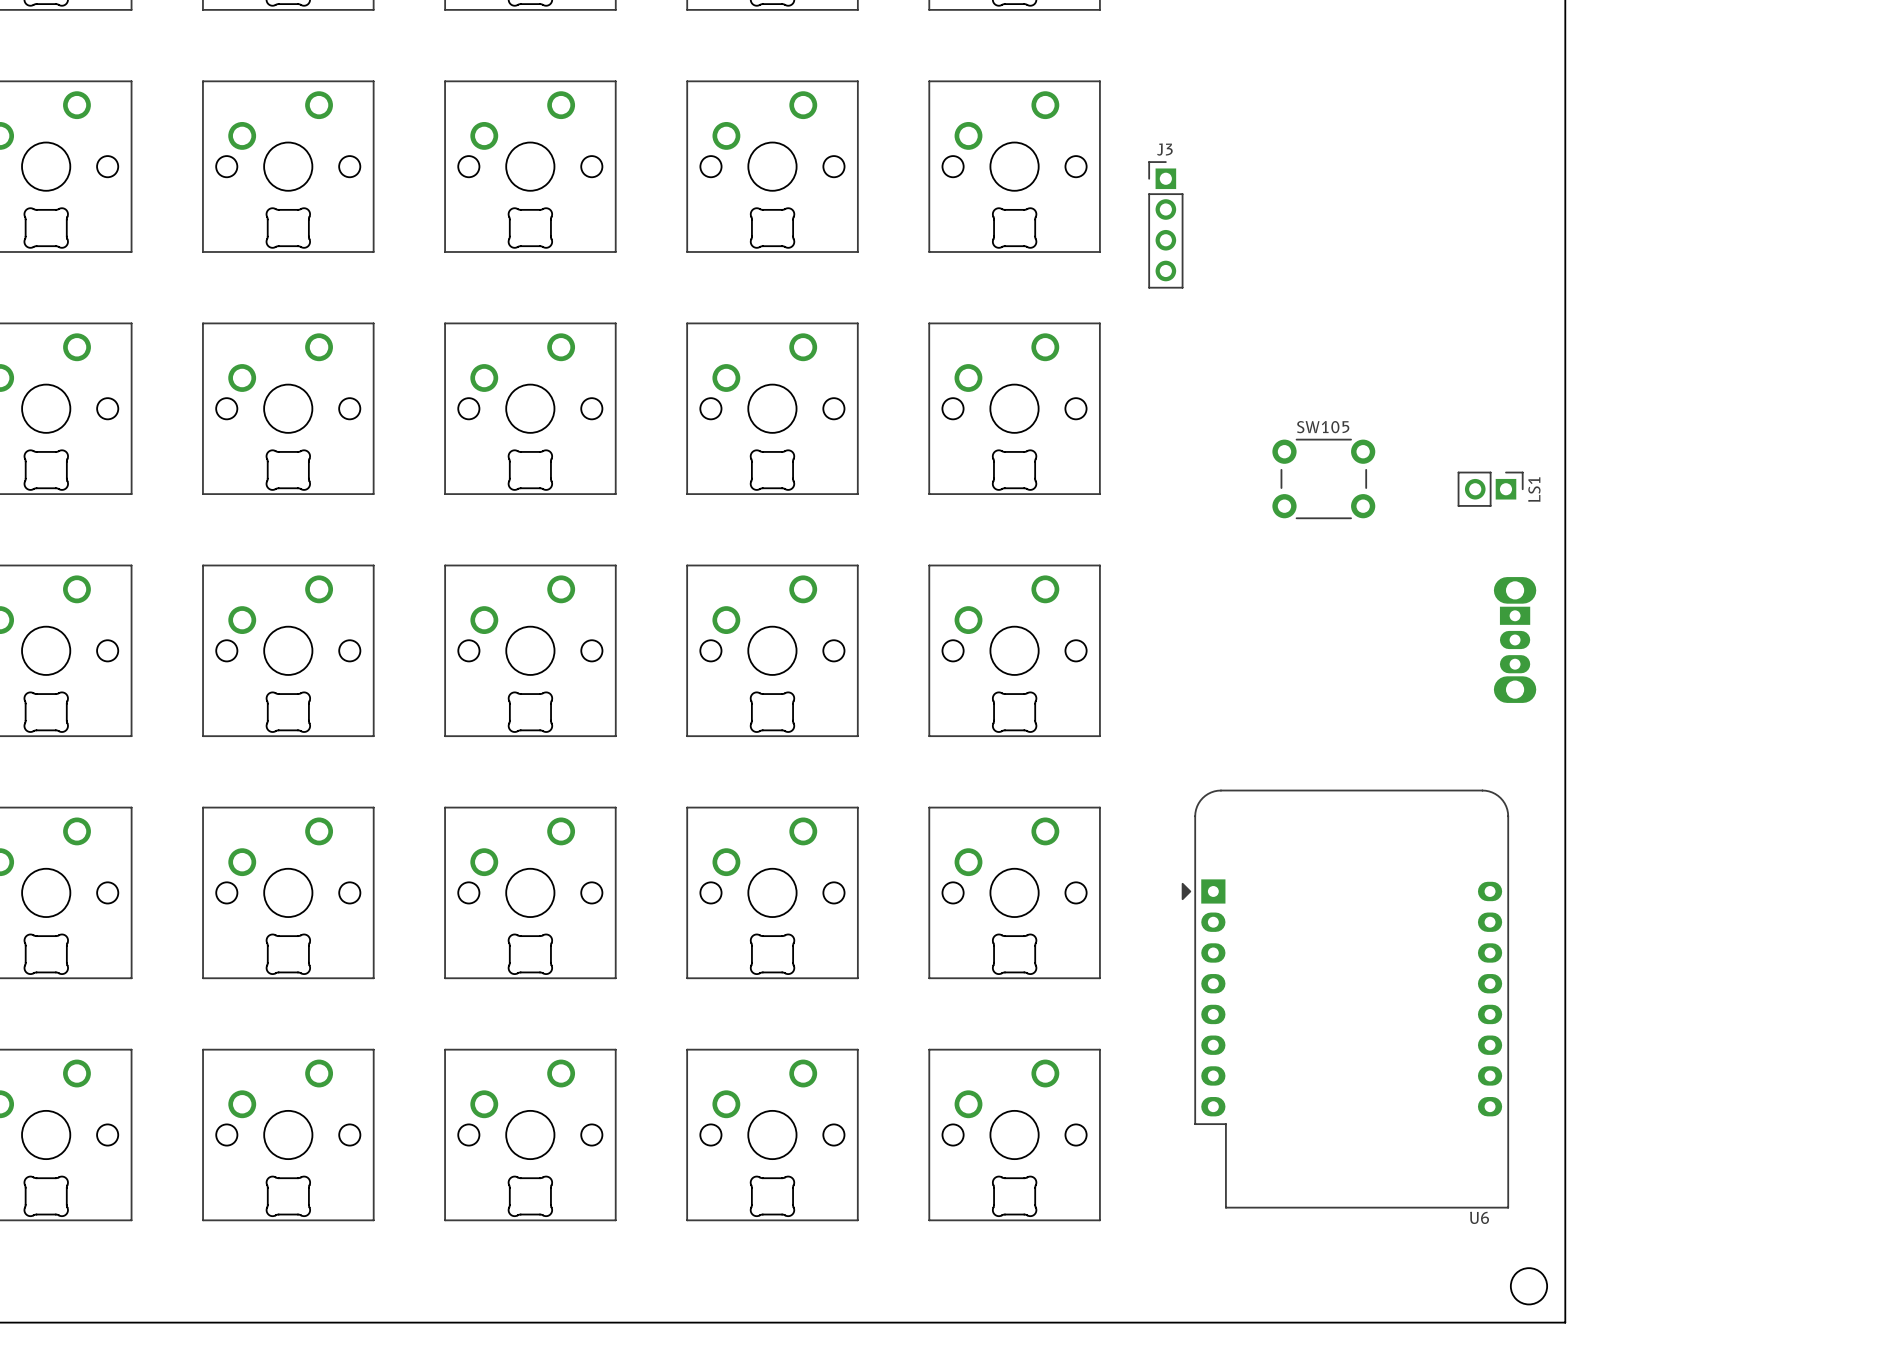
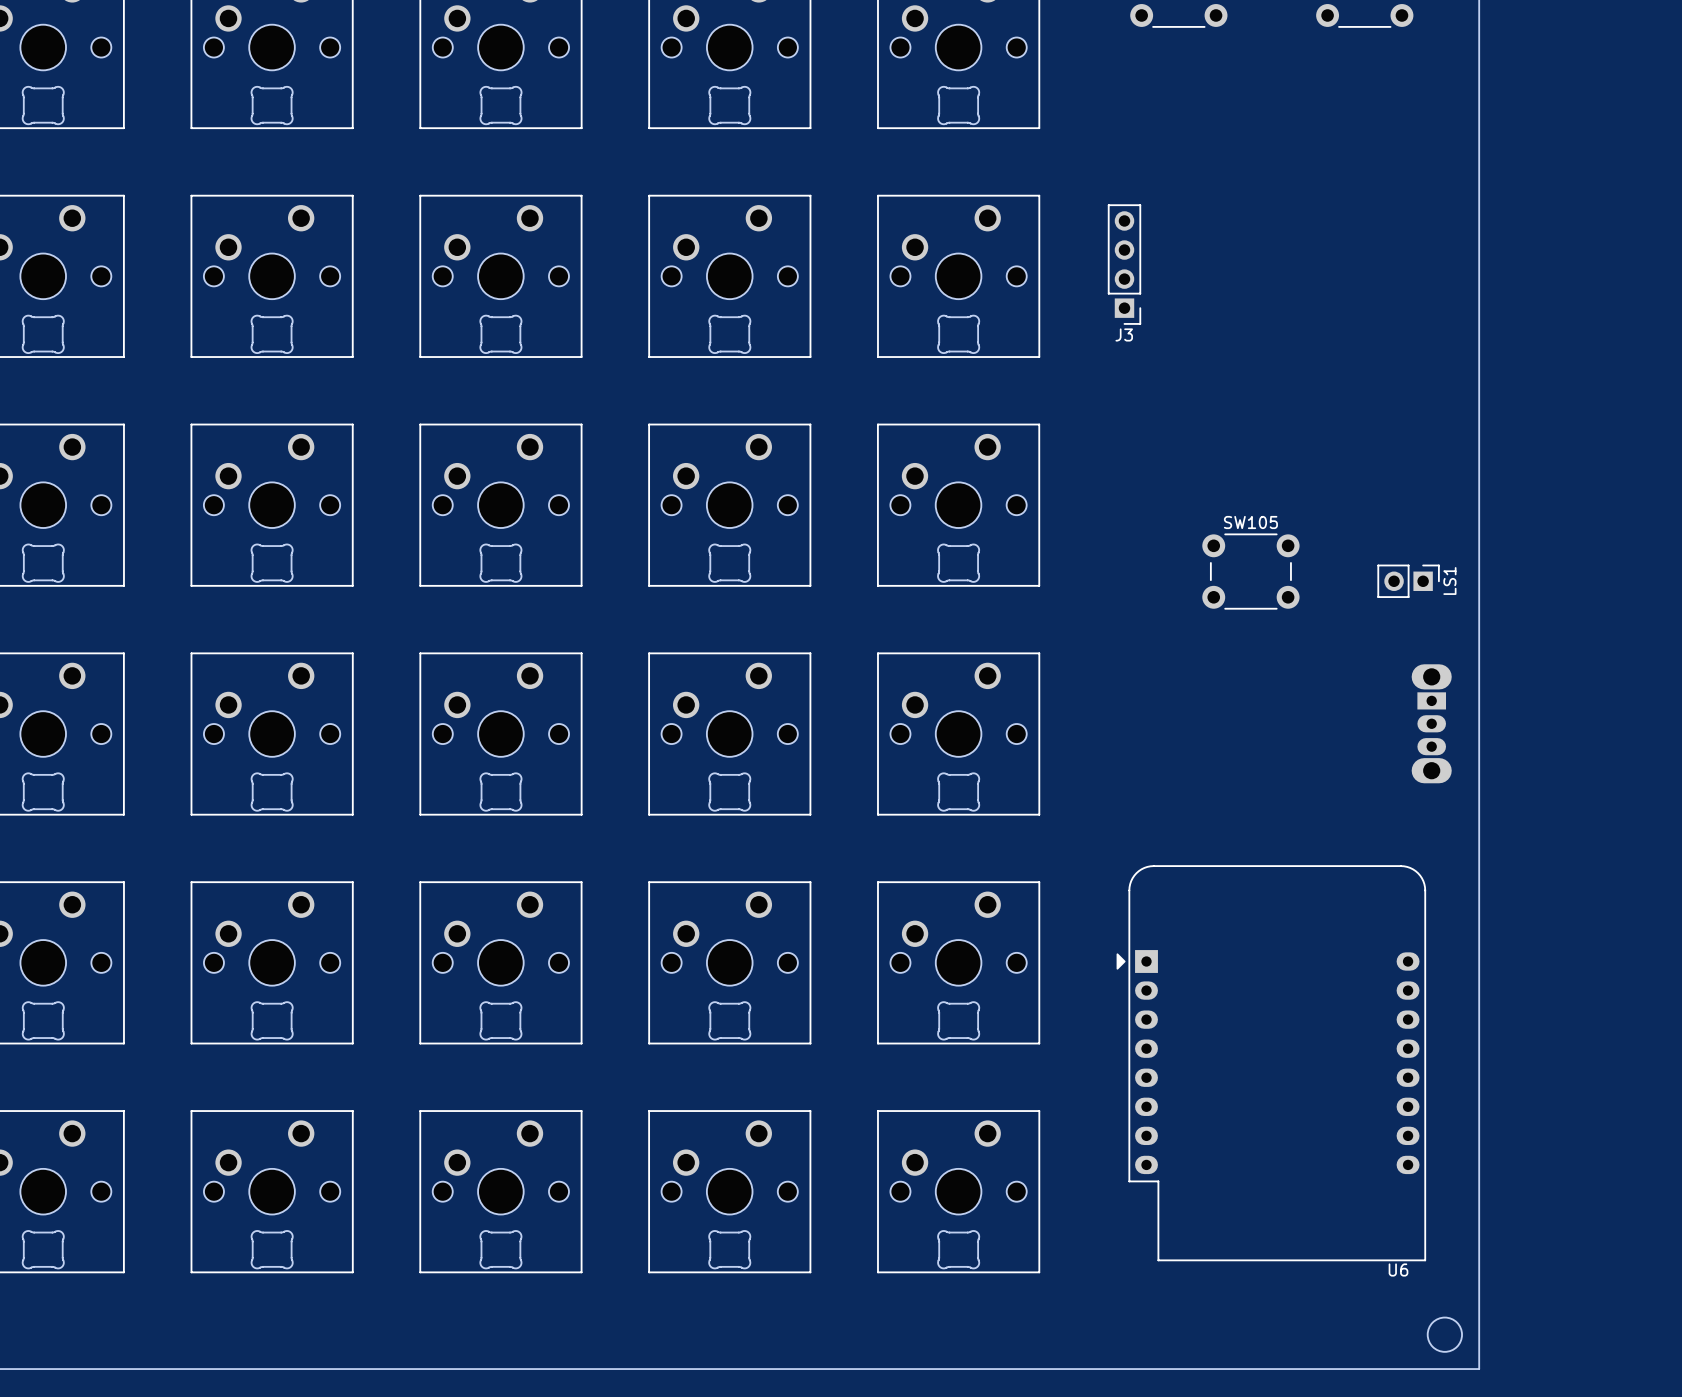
J3 rotation: 0° (1165, 224) -> 180° (1124, 264)

